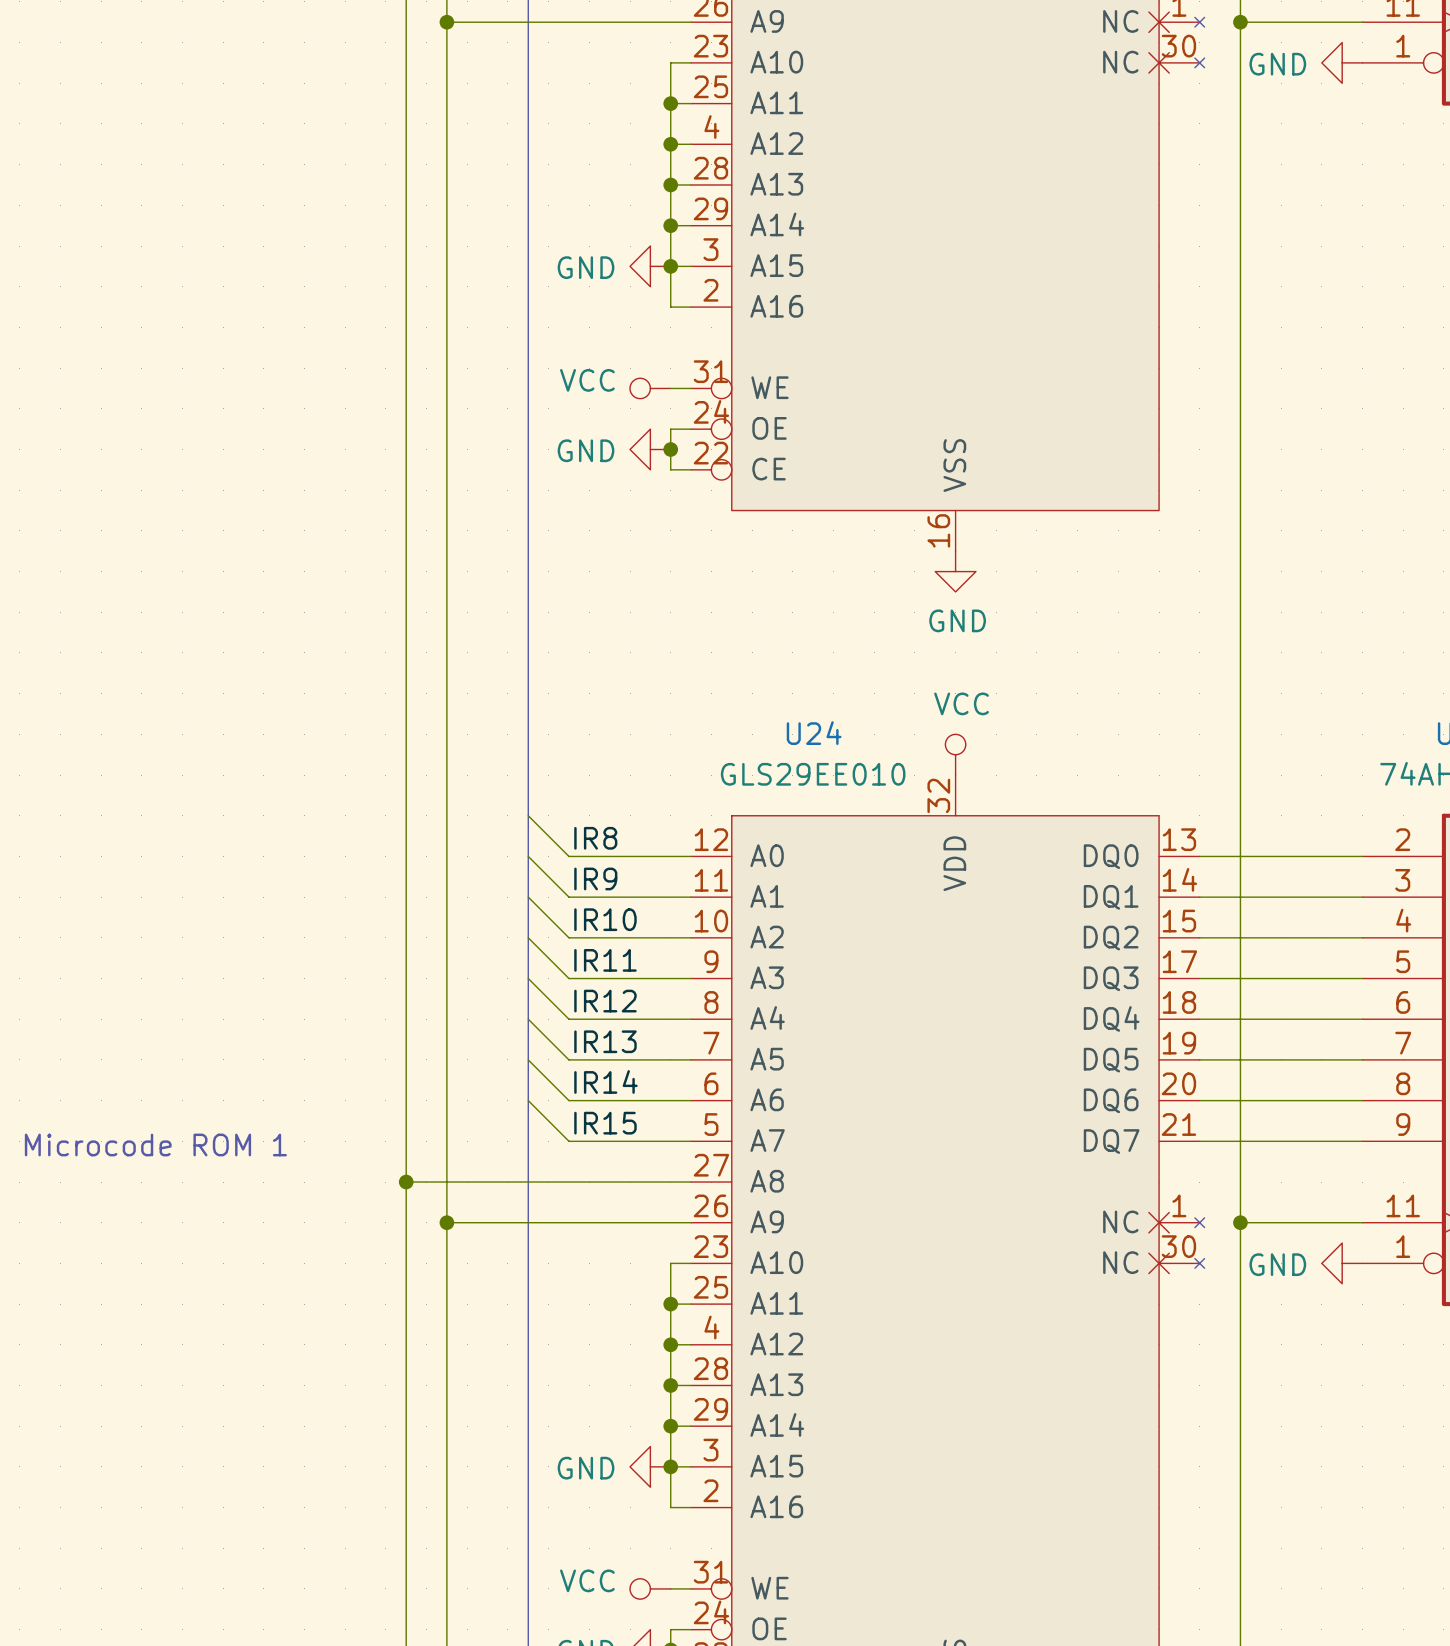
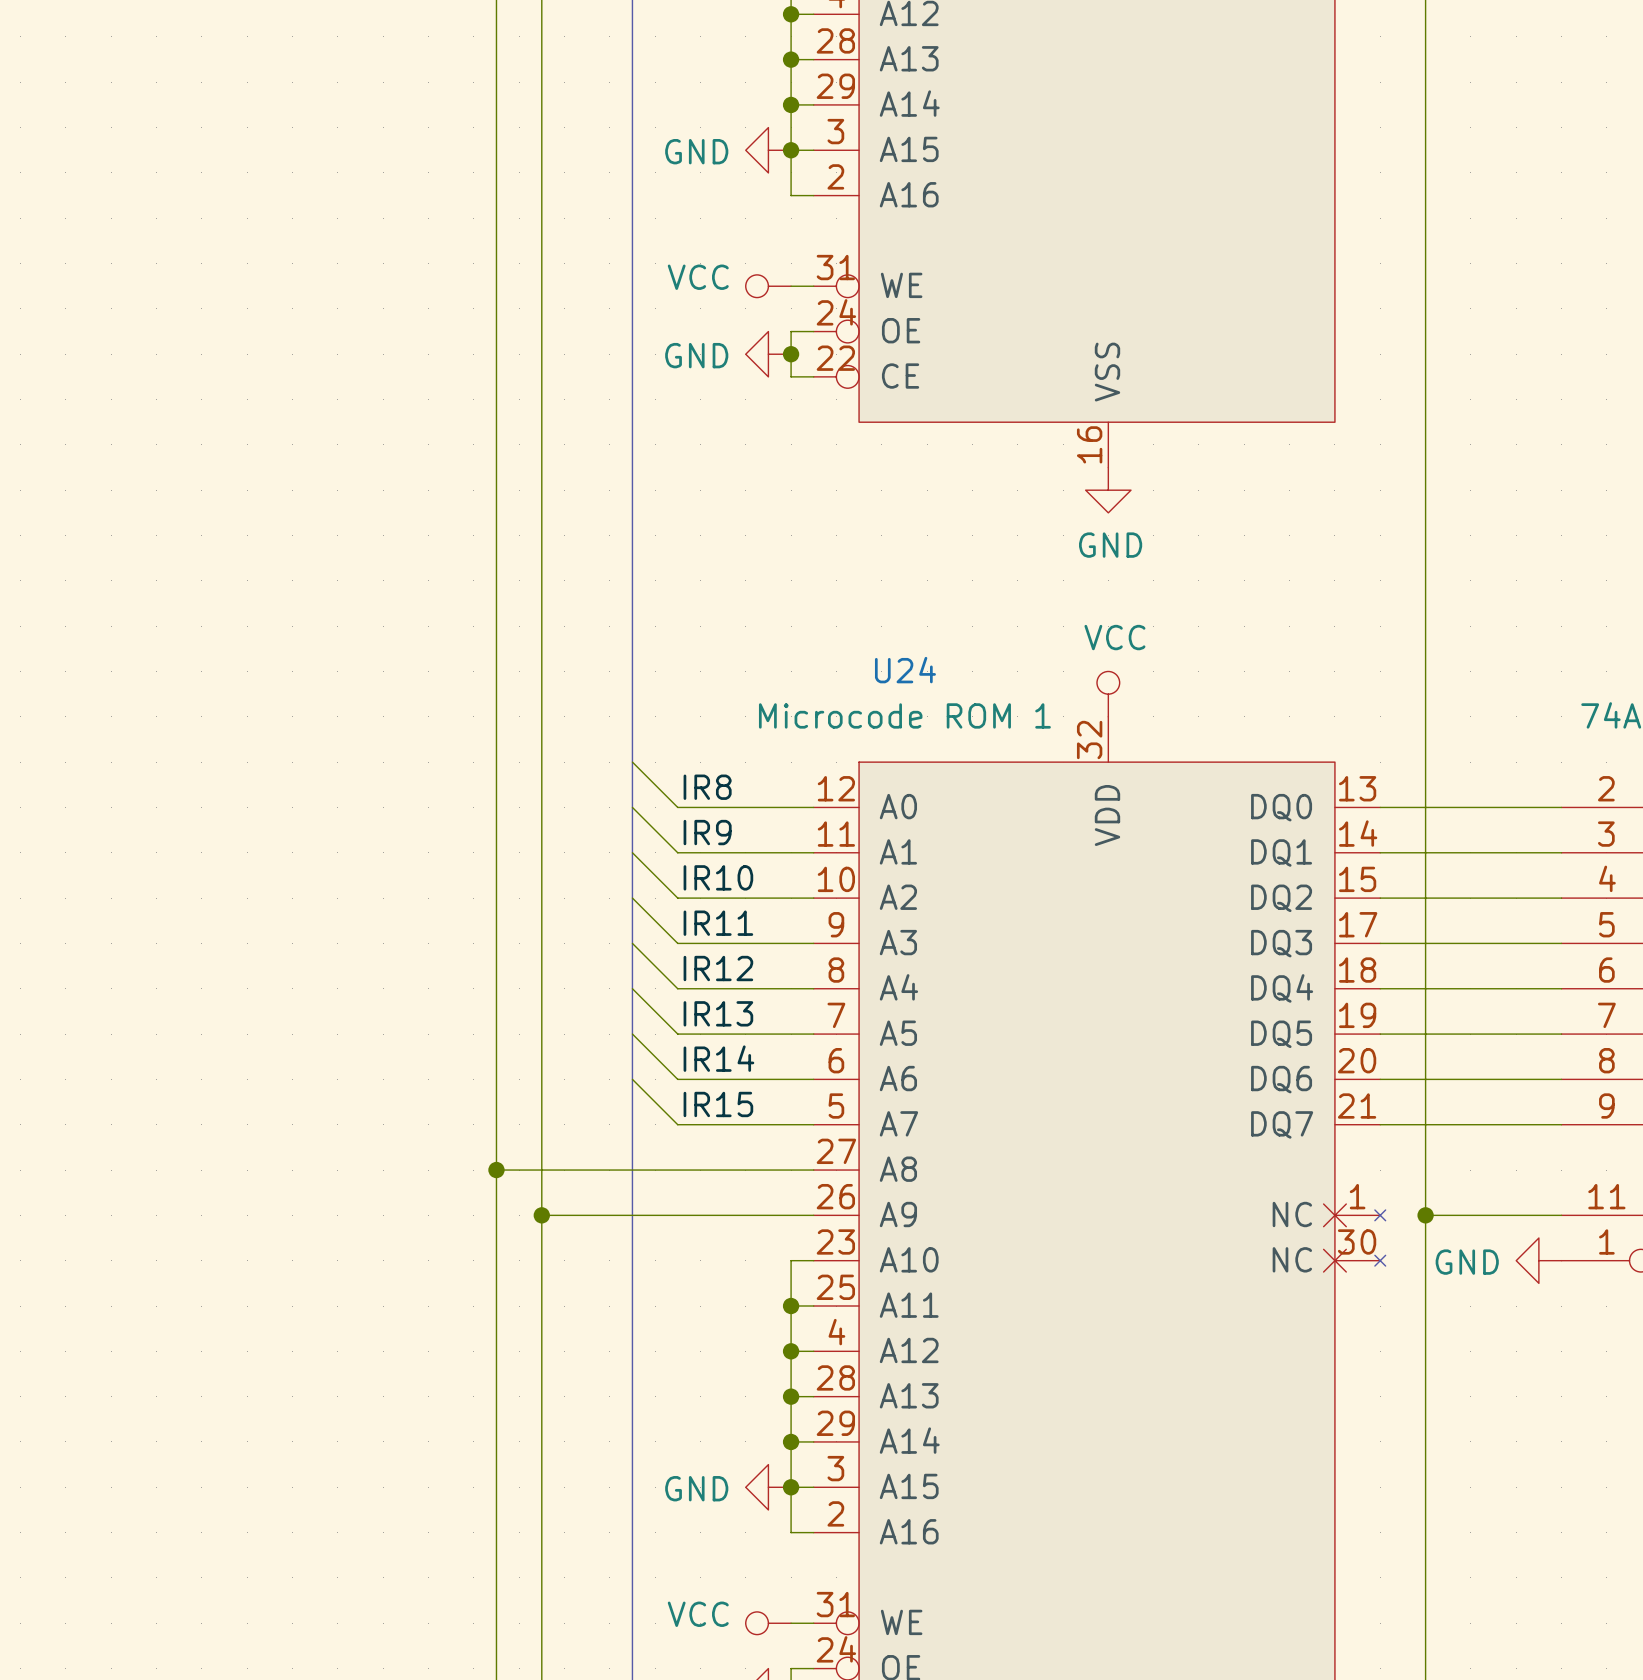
U24 name position: U24 (814, 733) -> U24 (905, 670)
U24 value: GLS29EE010 (813, 774) -> Microcode ROM 1 (904, 715)
text: Microcode ROM 1 (155, 1144) -> none

